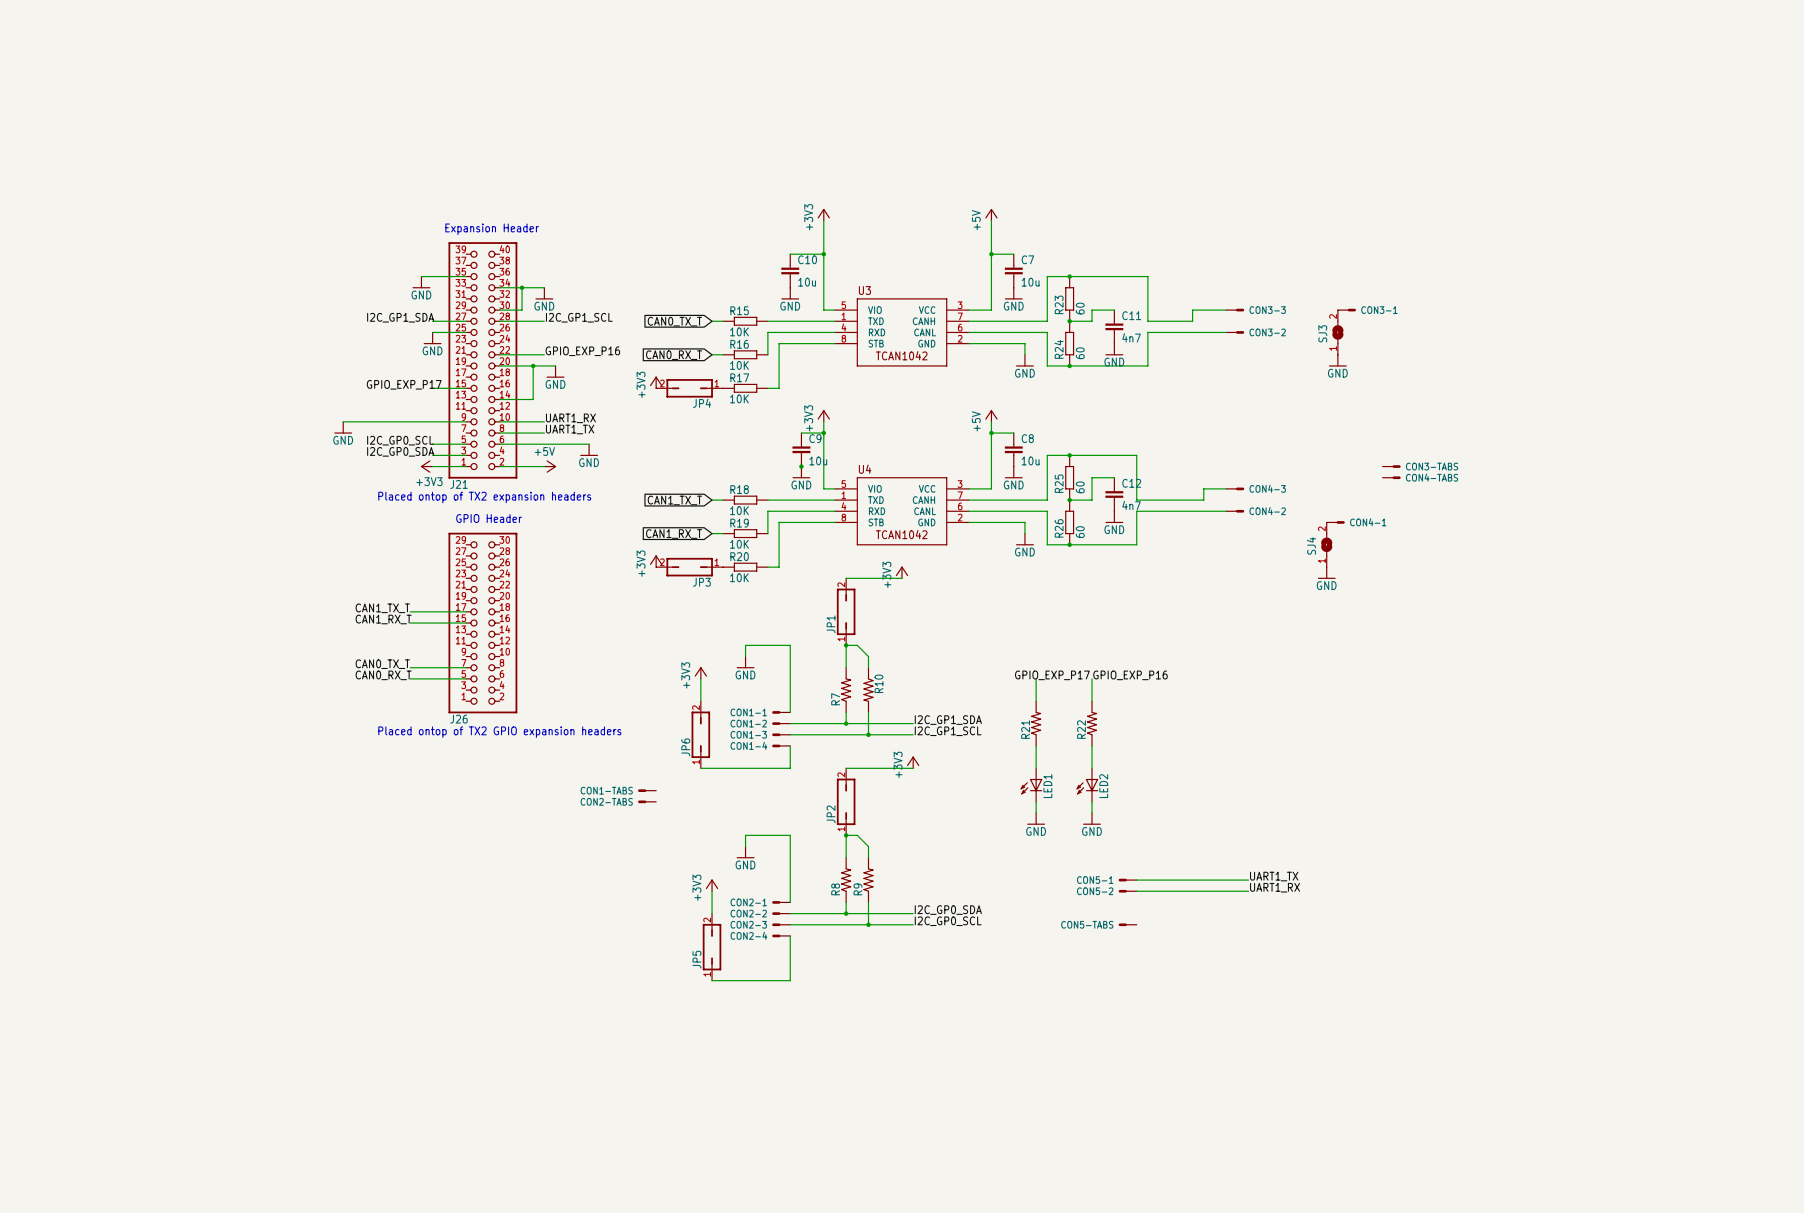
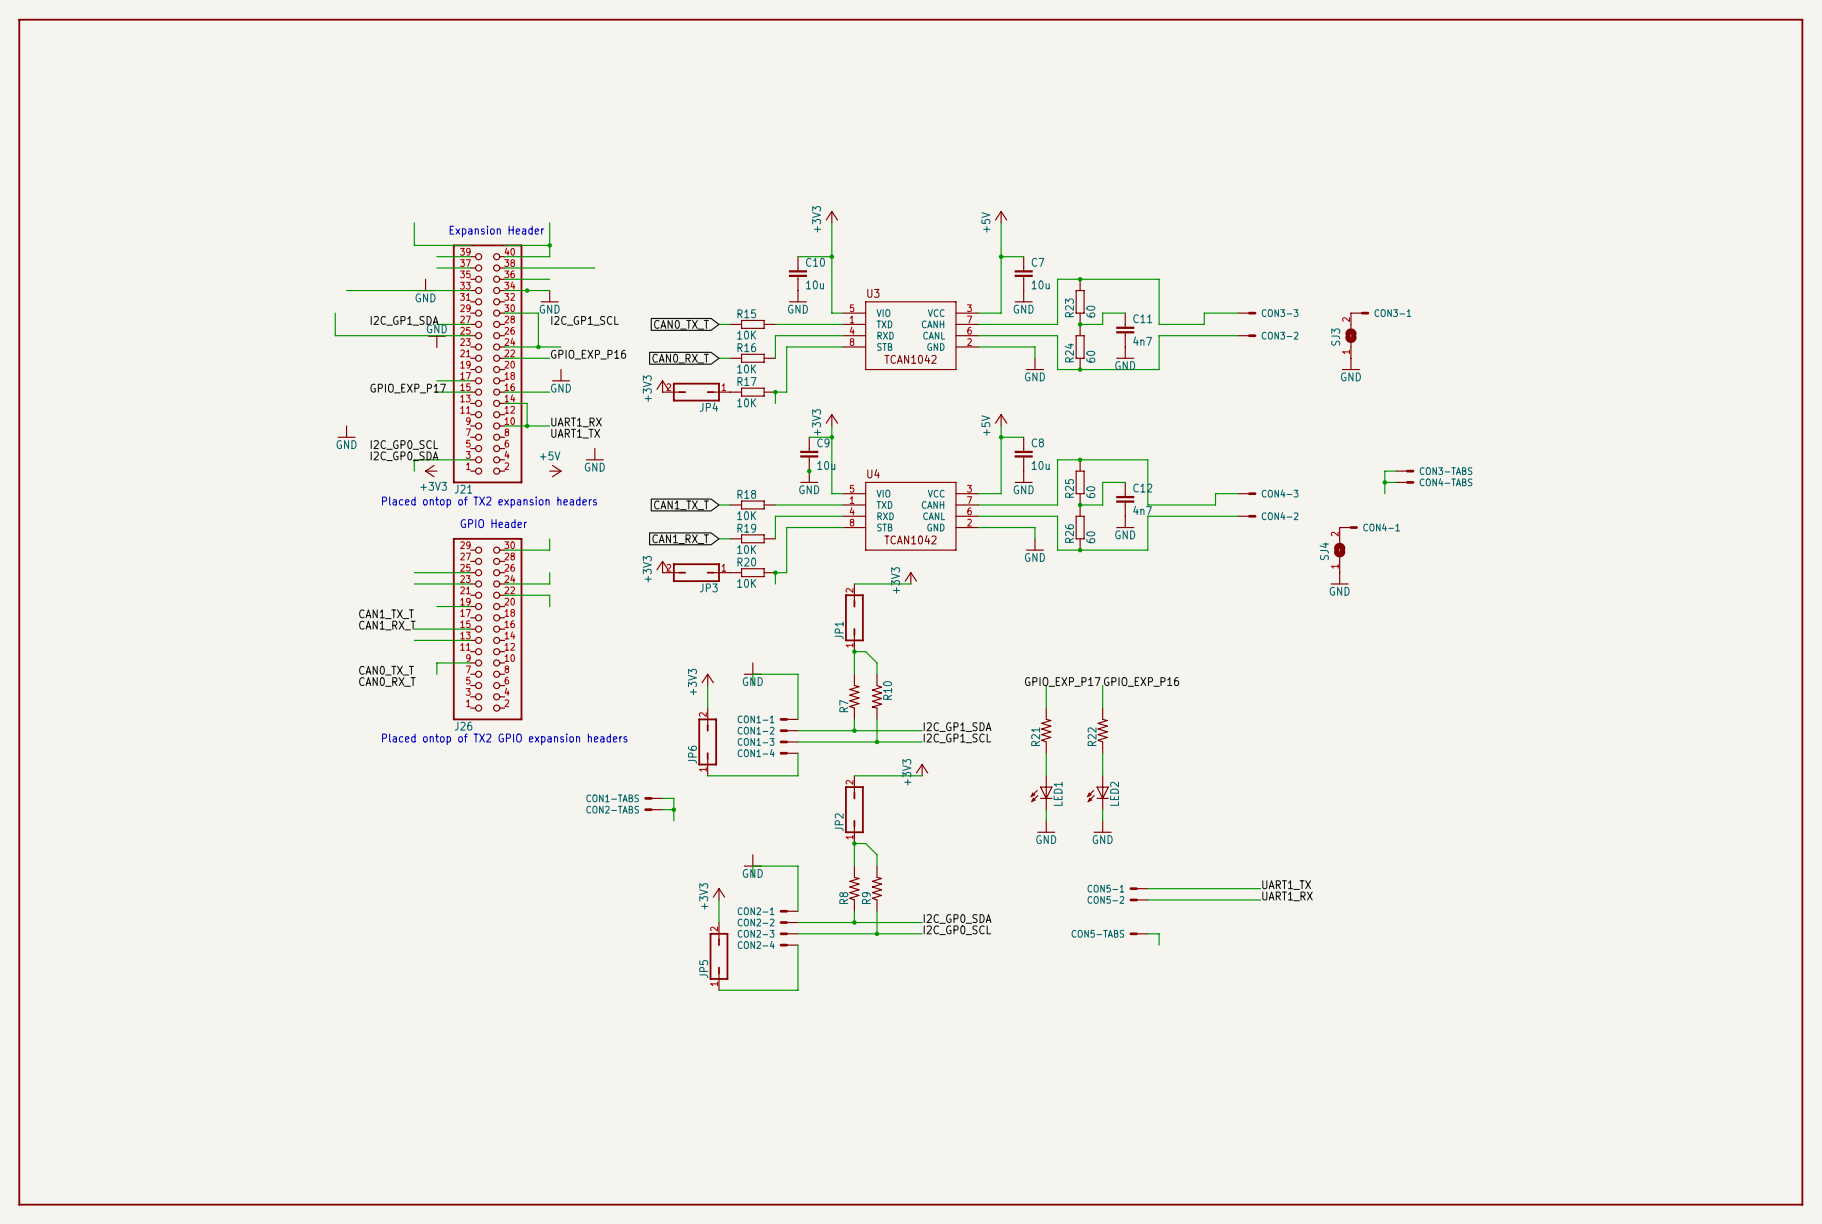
wire: none -> (414, 222) (414, 245) (470, 245)
wire: none -> (549, 222) (549, 256) (504, 256)
junction: none -> (549, 245)
wire: none -> (436, 256) (470, 256)
wire: none -> (436, 267) (470, 267)
wire: none -> (504, 267) (594, 267)
wire: (421, 276) (466, 276) -> (504, 245) (549, 245)
wire: none -> (346, 290) (470, 290)
wire: (522, 287) (522, 310) -> (538, 346) (538, 313) (527, 313)
wire: none -> (335, 313) (335, 335) (436, 335)
wire: (499, 321) (544, 321) -> (504, 279) (549, 279)
power symbol rotation: 0° (432, 343) -> 180° (436, 336)
wire: (499, 365) (555, 365) -> (504, 346) (560, 346)
wire: (533, 365) (533, 399) (522, 399) -> (527, 425) (527, 403)
junction position: (533, 365) -> (538, 346)
wire: none -> (775, 392) (775, 403)
junction: none -> (775, 392)
wire: (343, 421) (466, 421) -> none
junction: none -> (527, 425)
wire: (499, 433) (544, 433) -> (504, 392) (549, 392)
wire: (432, 444) (466, 444) -> none
wire: (499, 444) (589, 444) -> none
wire: none -> (436, 459) (414, 459) (414, 471)
wire: (432, 466) (466, 466) -> (436, 380) (470, 380)
wire: (499, 466) (544, 466) -> none
wire: none -> (1396, 471) (1384, 471) (1384, 493)
wire: none -> (1384, 482) (1396, 482)
junction: none -> (1384, 482)
wire: none -> (549, 538) (549, 550) (504, 550)
wire: none -> (549, 572) (549, 583) (504, 583)
wire: none -> (775, 572) (775, 583)
junction: none -> (775, 572)
wire: none -> (504, 595) (549, 595) (549, 606)
wire: none -> (436, 606) (470, 606)
part: none -> (910, 612)
wire: (410, 611) (466, 611) -> (414, 572) (470, 572)
wire: none -> (470, 662) (436, 662) (436, 674)
wire: (745, 656) (745, 645) (790, 645) (790, 667) -> (752, 685) (752, 674) (797, 674)
wire: (410, 667) (466, 667) -> (414, 583) (470, 583)
wire: (410, 678) (466, 678) -> (414, 640) (470, 640)
wire: none -> (662, 798) (673, 798) (673, 820)
wire: none -> (662, 809) (673, 809)
junction: none -> (673, 809)
wire: (745, 846) (745, 835) (790, 835) (790, 857) -> (752, 877) (752, 866) (797, 866)
wire: none -> (1147, 933) (1159, 933) (1159, 945)

